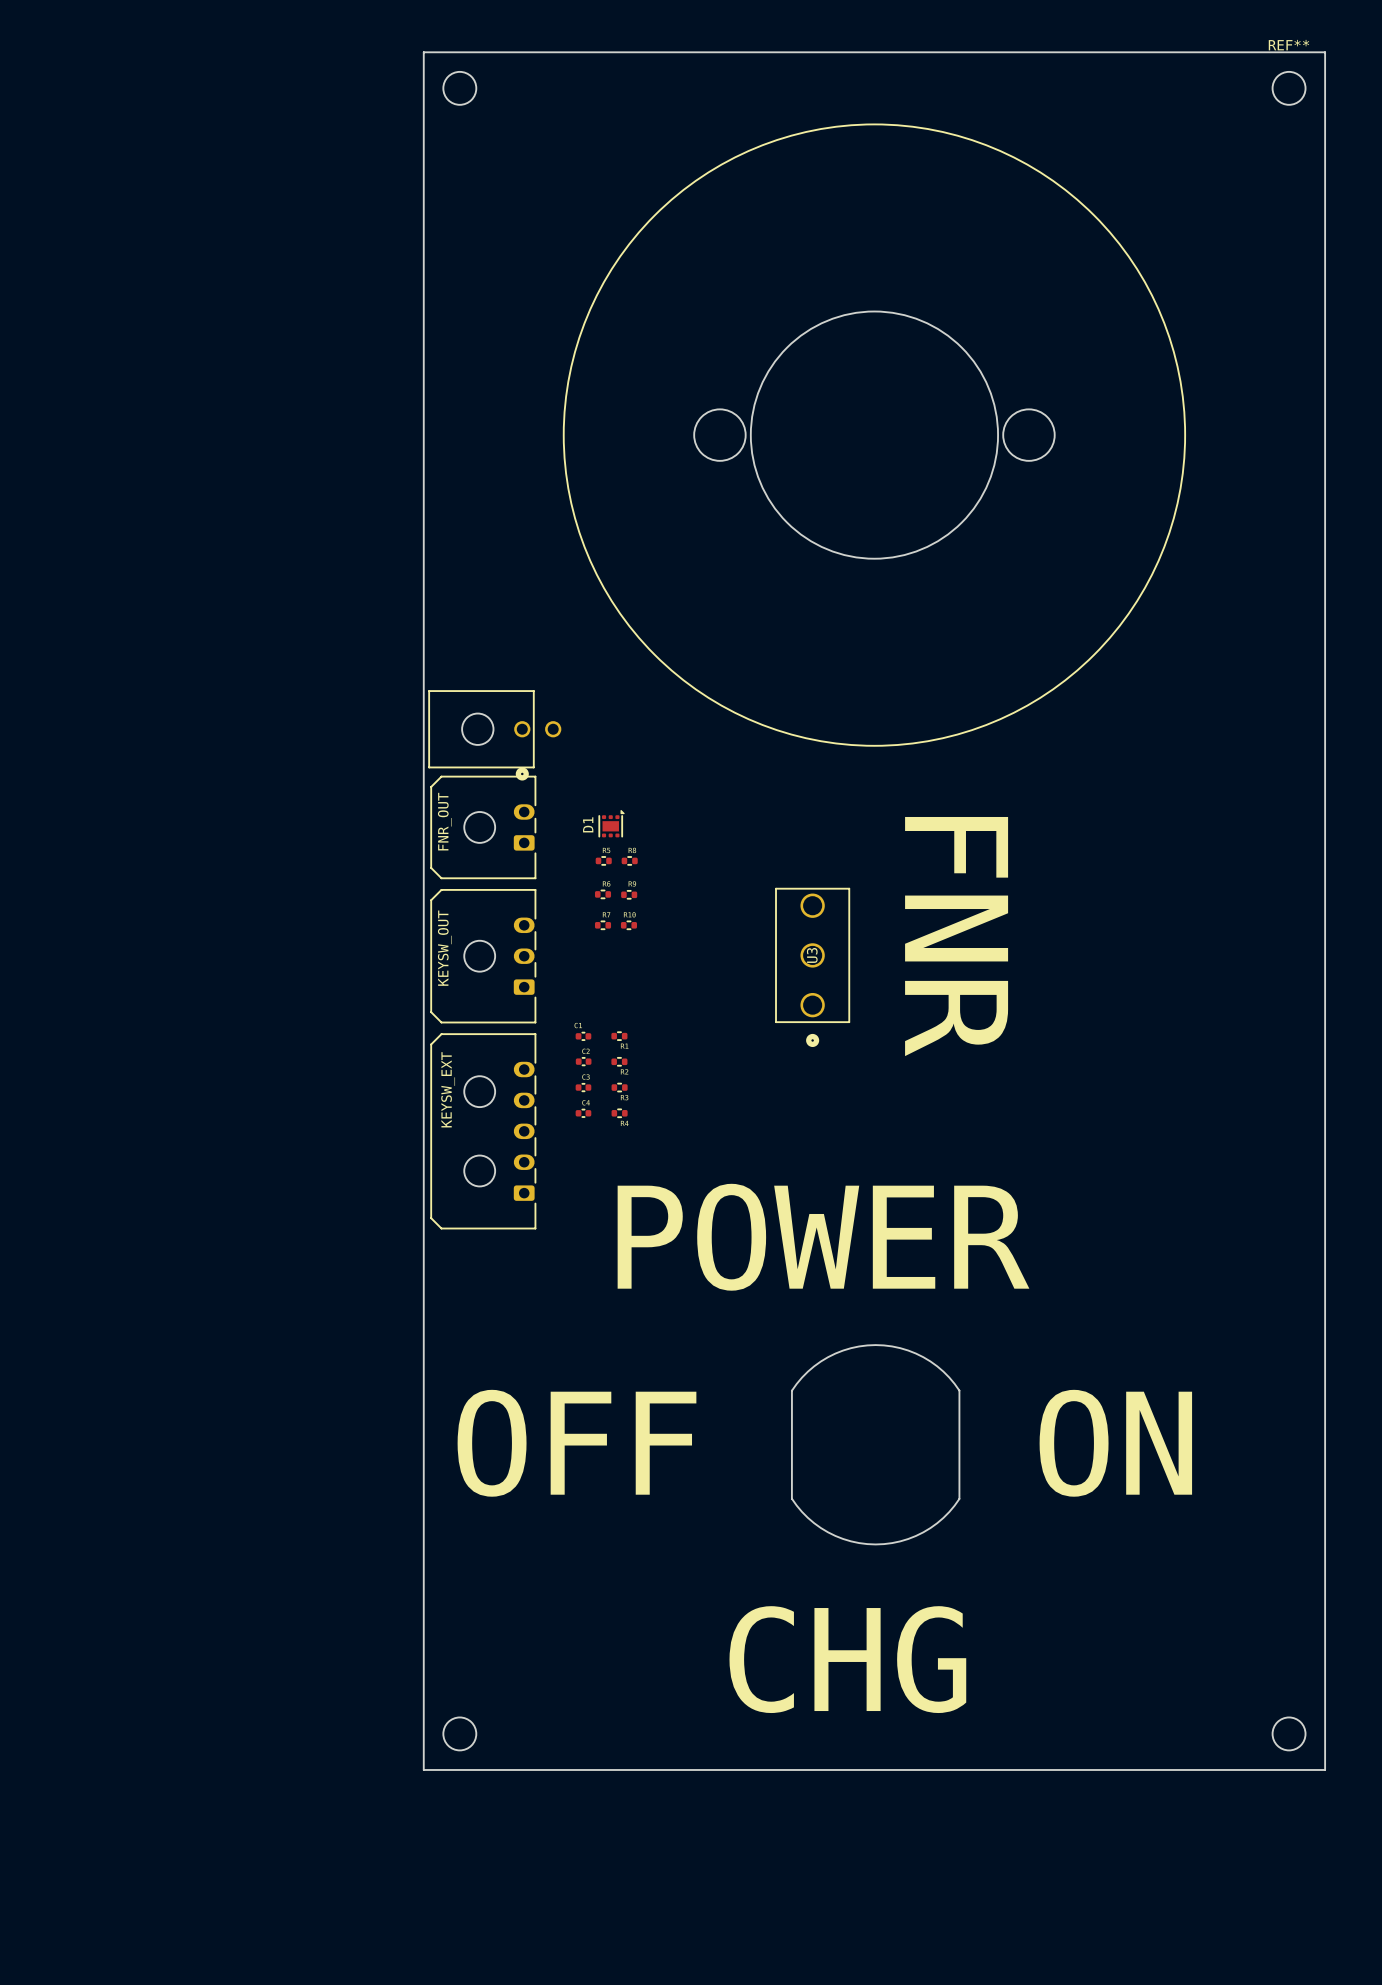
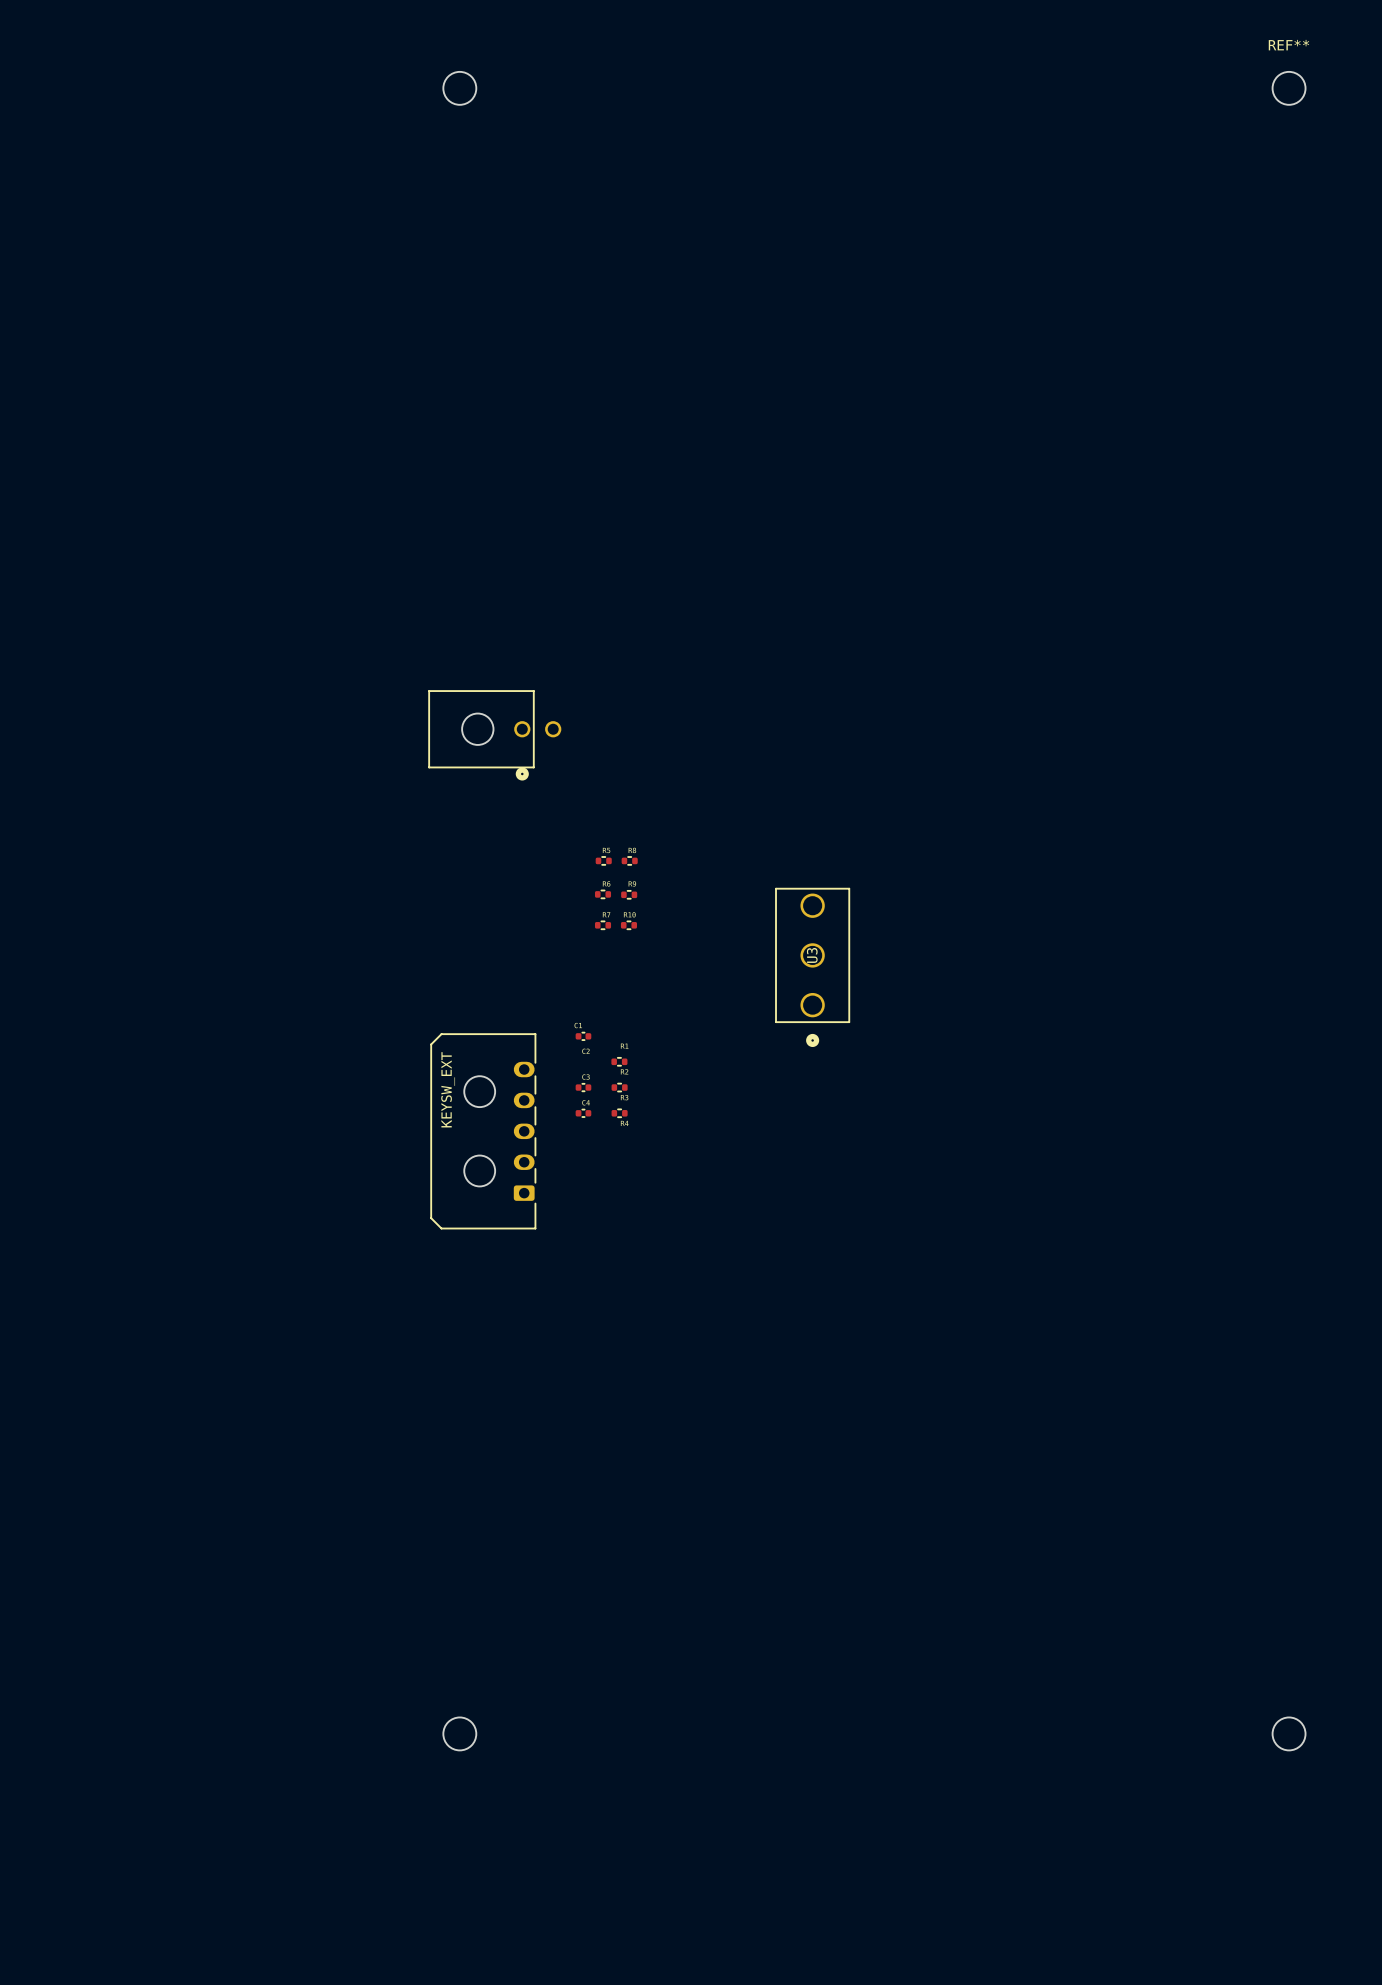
board edge: (423, 52) (1325, 52) (1325, 1769) (423, 1769) (423, 52) -> none
drawing: [563, 123, 1186, 747] -> none
round board edge: [750, 311, 999, 559] -> none
round board edge: [693, 409, 746, 462] -> none
round board edge: [1002, 409, 1055, 462] -> none
part: D1 (611, 823) -> none
part: FNR_OUT (483, 827) -> none
text: FNR (956, 936) -> none
part: KEYSW_OUT (483, 956) -> none
part: (619, 1036) -> none
part: (583, 1061) -> none
text: POWER (823, 1237) -> none
board edge: (959, 1390) (959, 1498) (943, 1517) (930, 1528) (908, 1539) (892, 1543) (875, 1544) (851, 1541) (835, 1535) (814, 1523) (791, 1498) (791, 1390) (802, 1377) (820, 1361) (843, 1350) (859, 1346) (883, 1345) (900, 1348) (915, 1353) (937, 1366) (959, 1390) -> none
text: OFF (576, 1443) -> none
text: ON (1115, 1443) -> none
text: CHG (847, 1659) -> none

